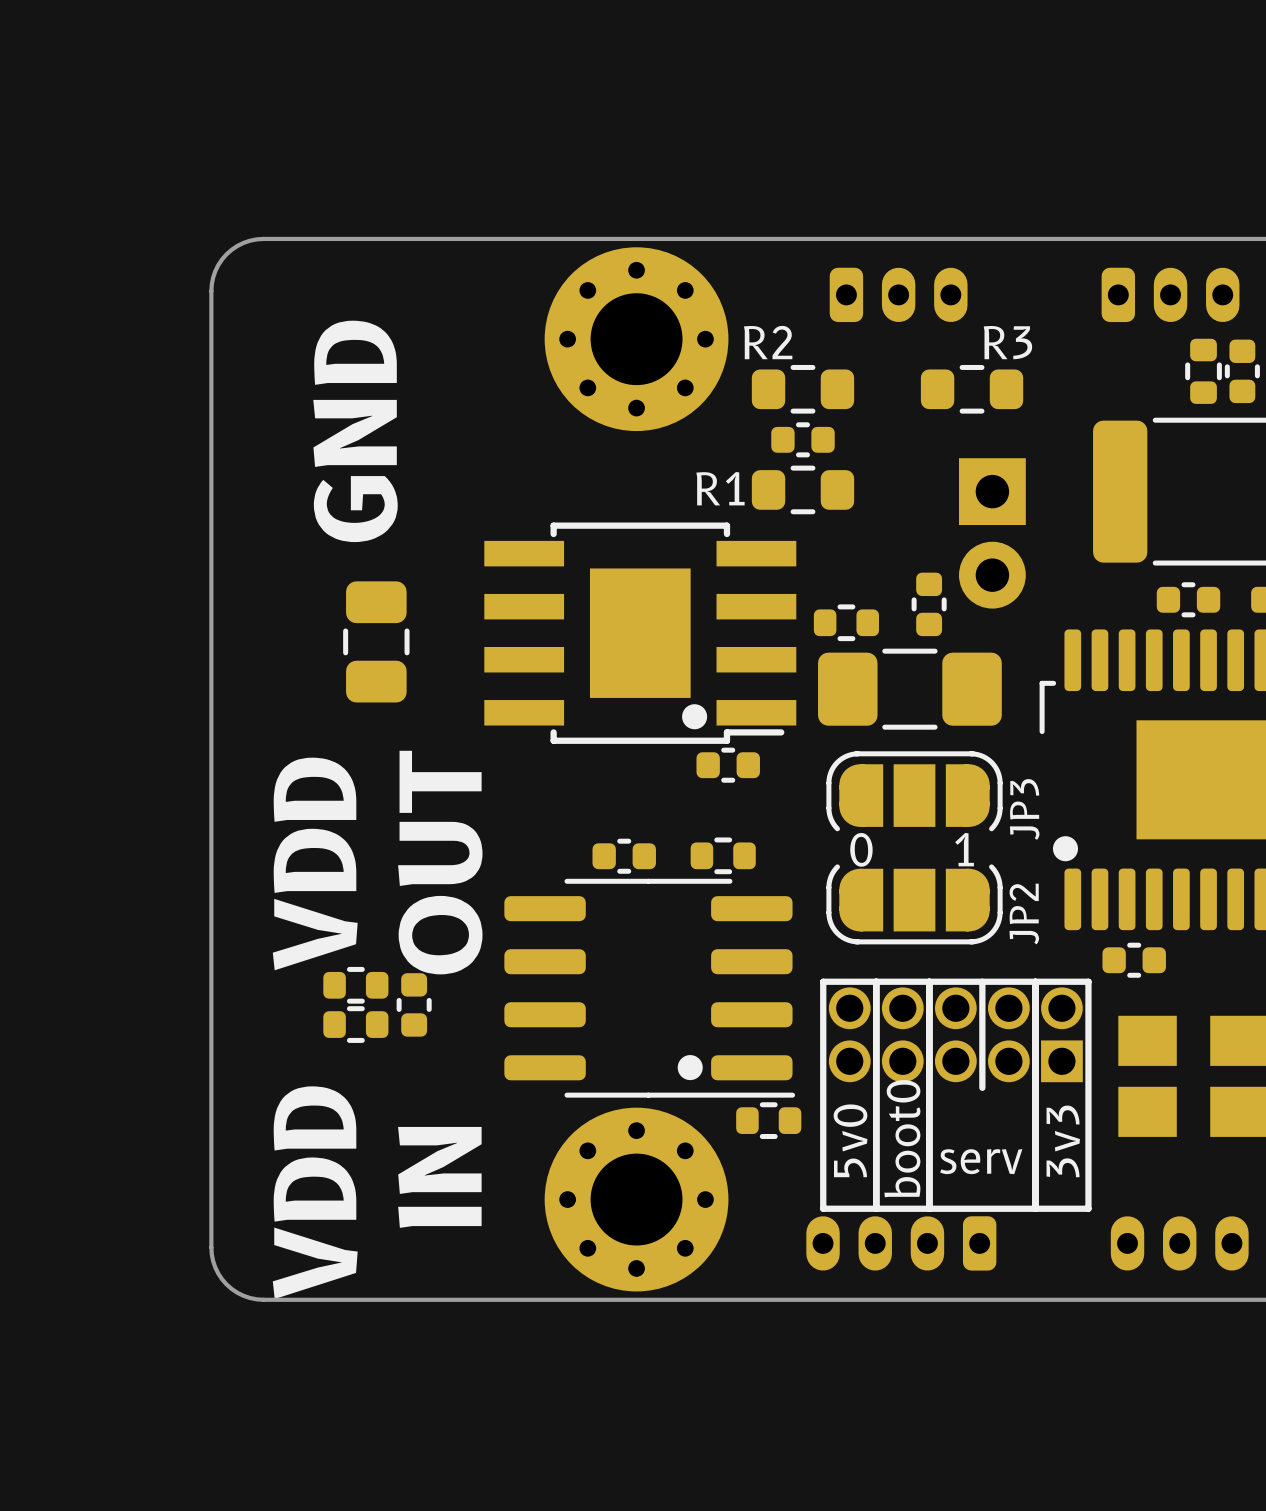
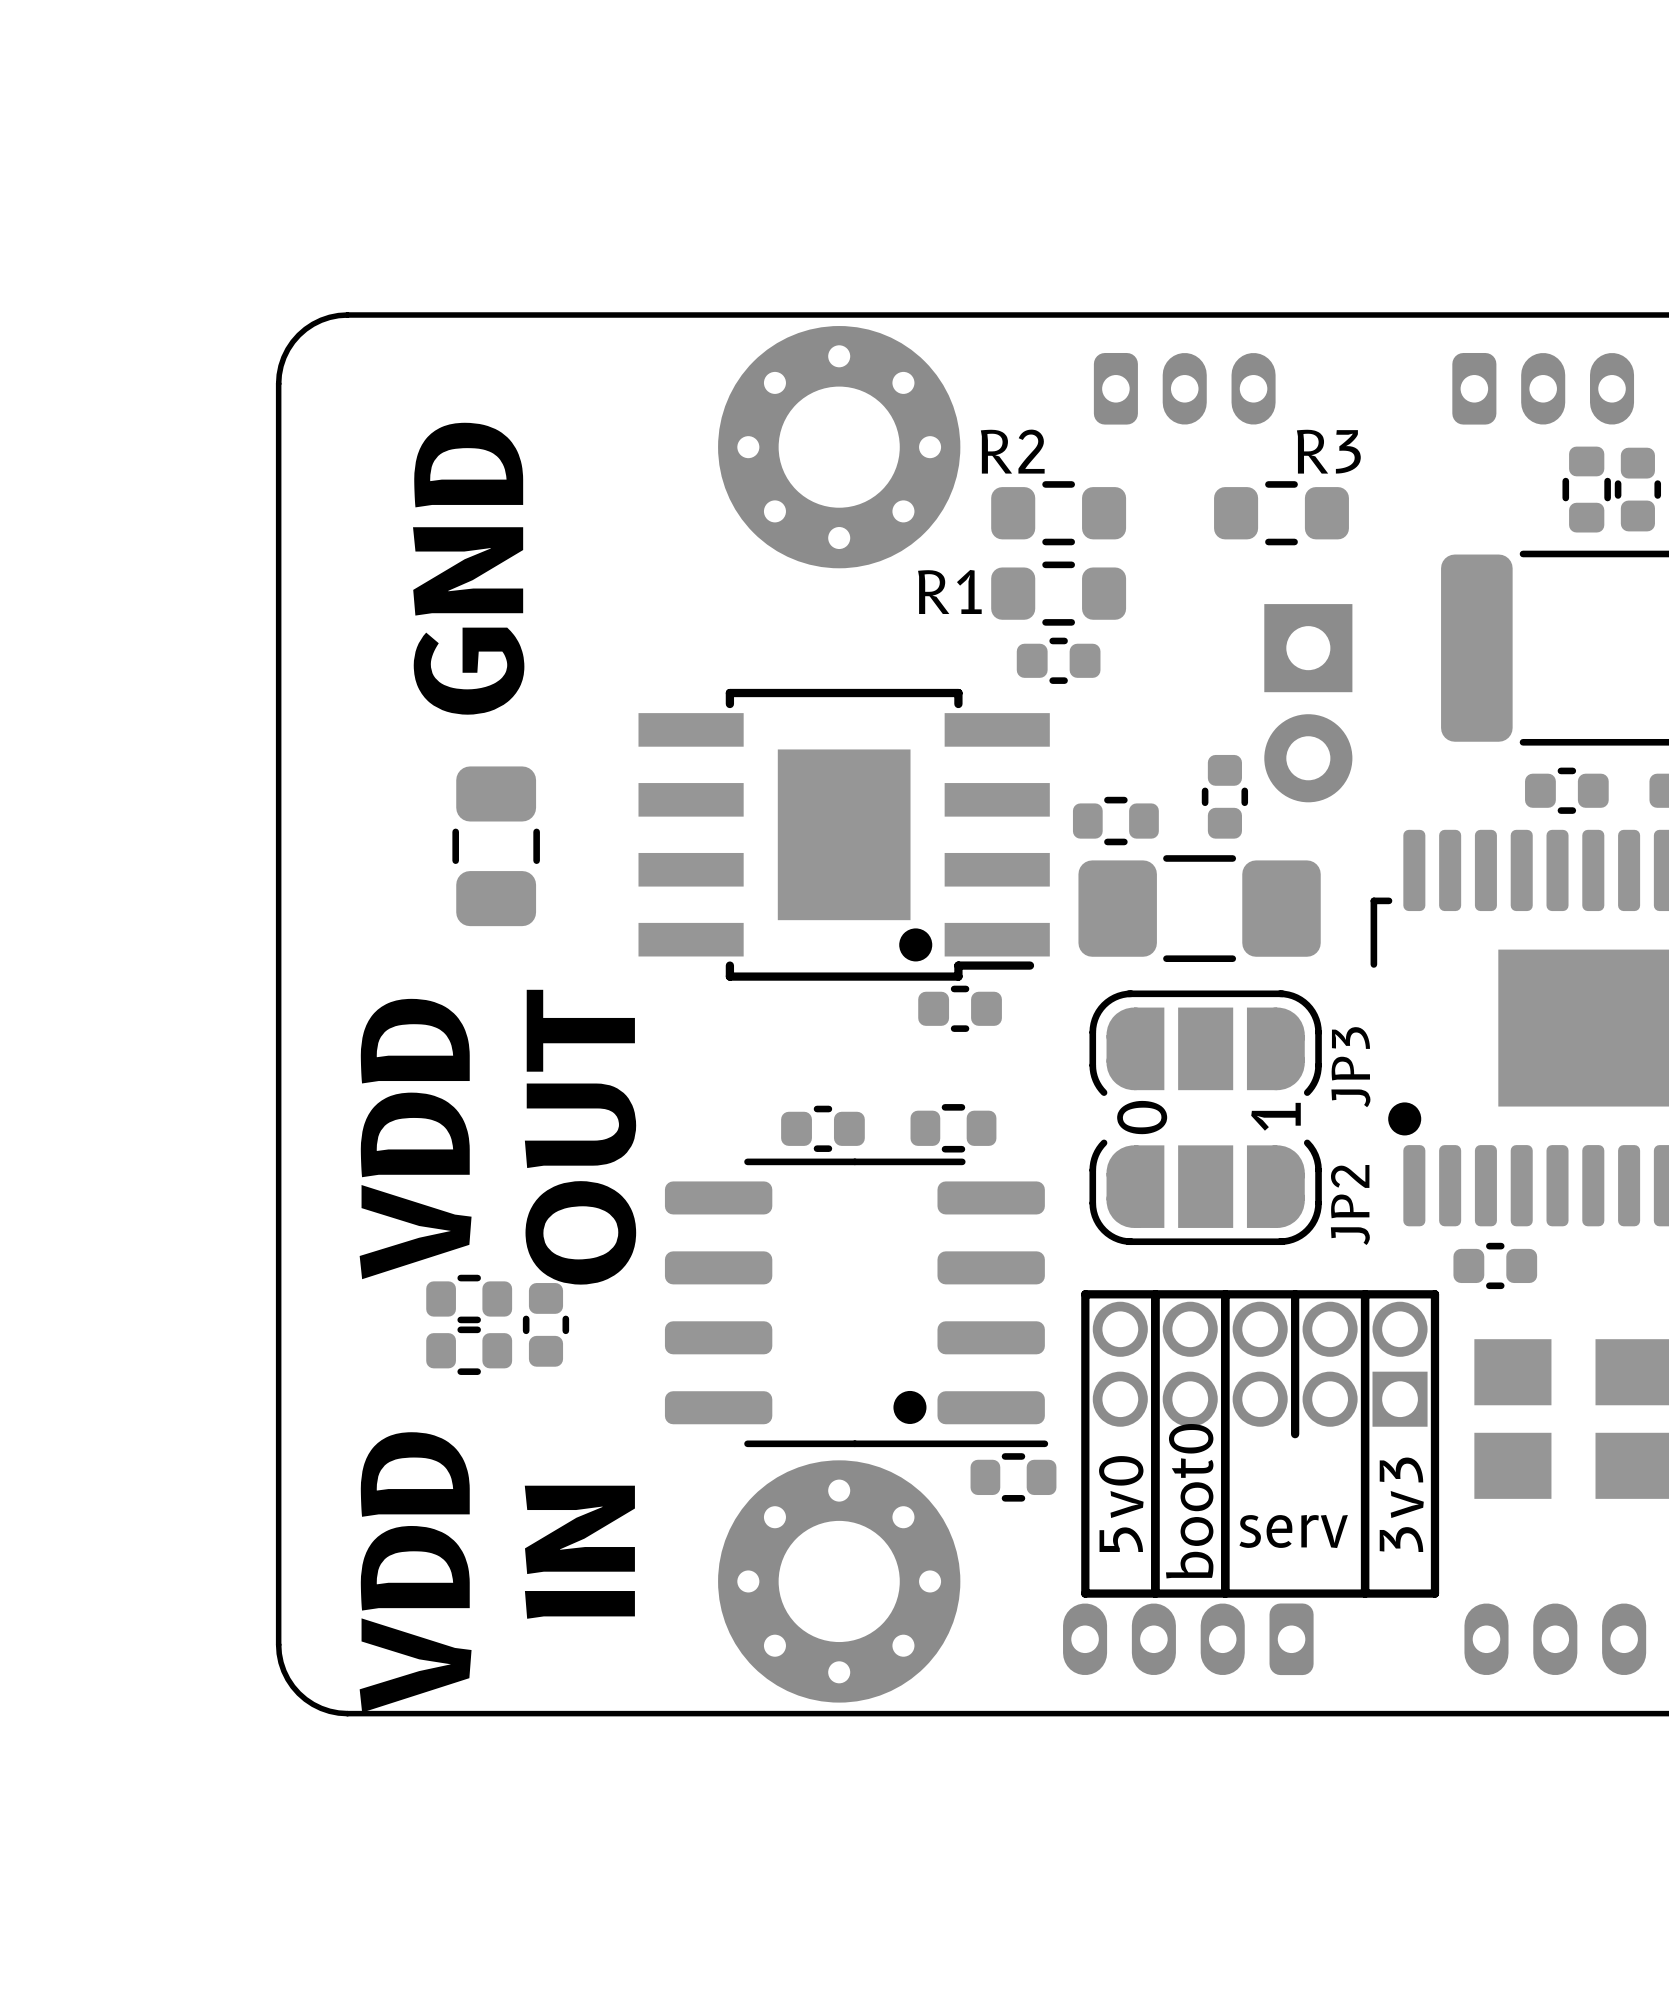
part position: (802, 439) -> (1058, 660)
R1 position: (802, 489) -> (1058, 593)
text rotation: 0° (861, 849) -> 90° counterclockwise (1142, 1117)
text rotation: 0° (964, 849) -> 90° counterclockwise (1276, 1116)

